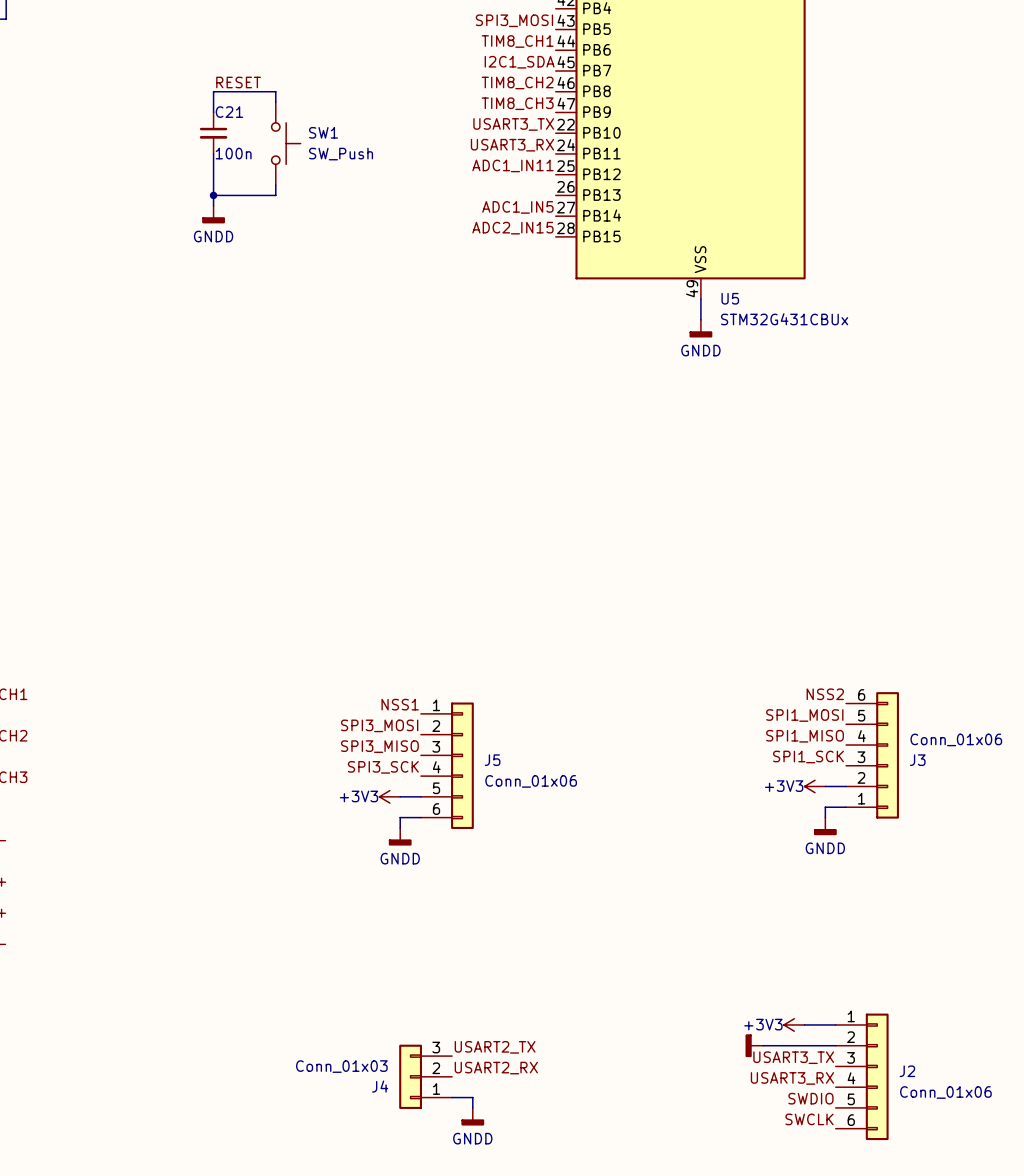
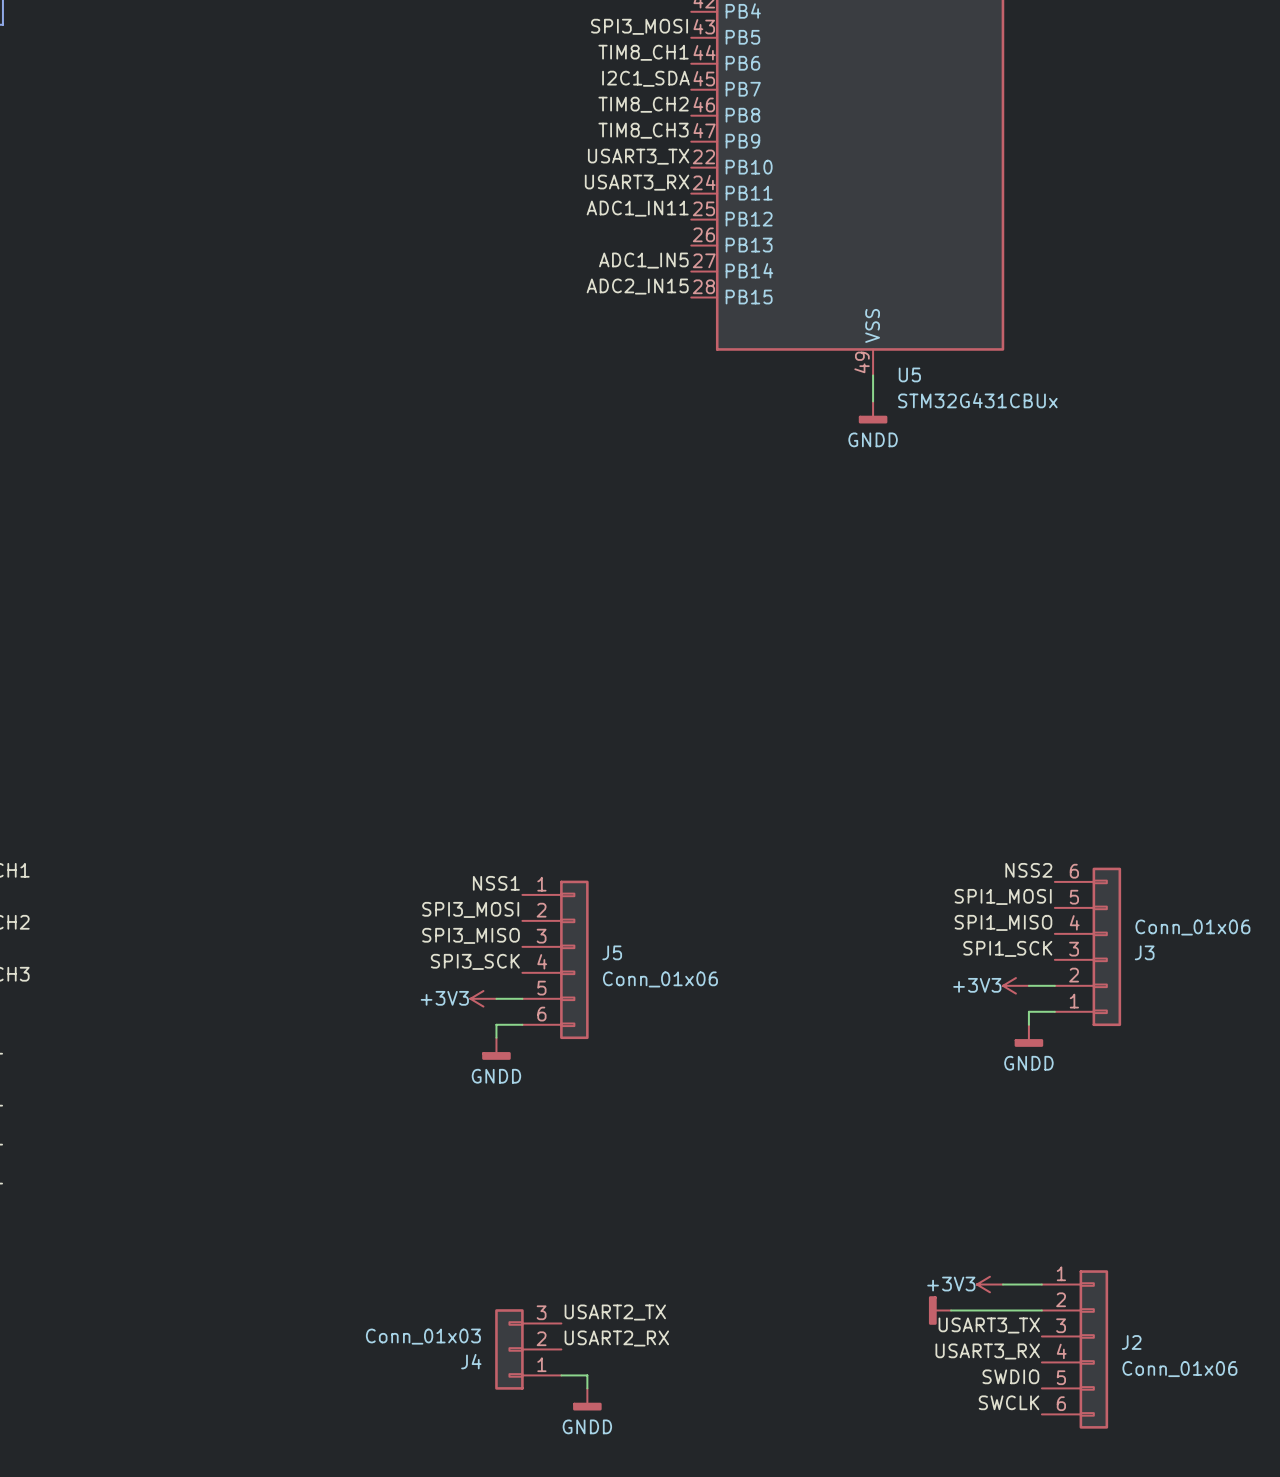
label: RESET (238, 82) -> none
wire: (275, 102) (275, 91) (213, 91) (213, 112) -> none
C21: 100n (213, 133) -> none
SW1: SW_Push (286, 143) -> none
wire: (213, 153) (213, 205) -> none
wire: (275, 185) (275, 195) (213, 195) -> none
junction: (213, 195) -> none
power symbol: GNDD (213, 214) -> none

